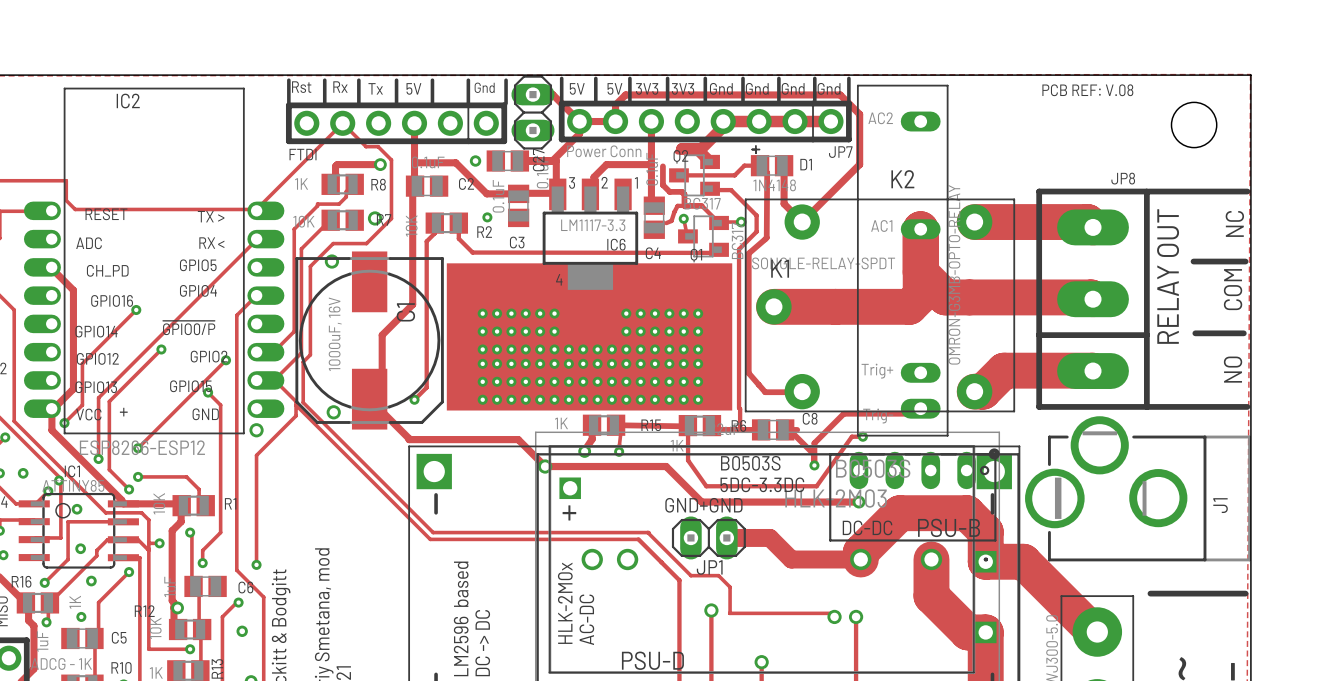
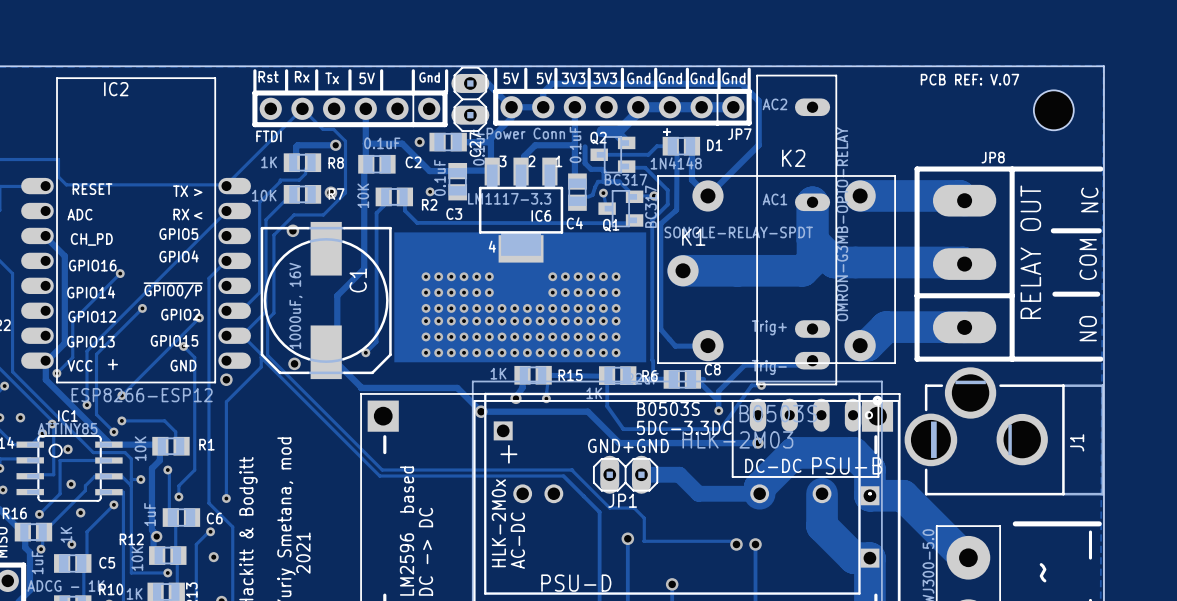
text: PCB REF: V.08 (1087, 90) -> PCB REF: V.07 (969, 79)

